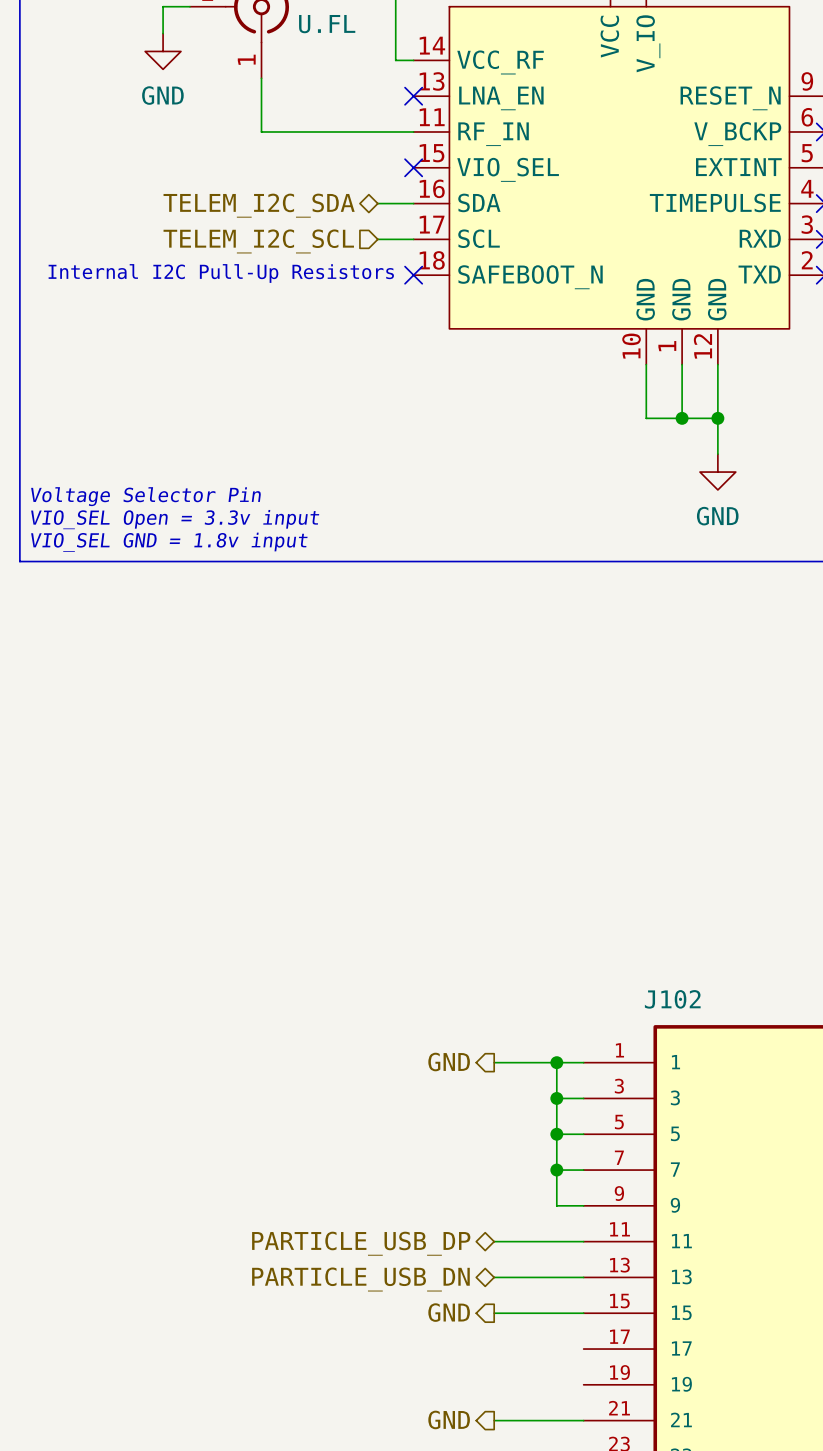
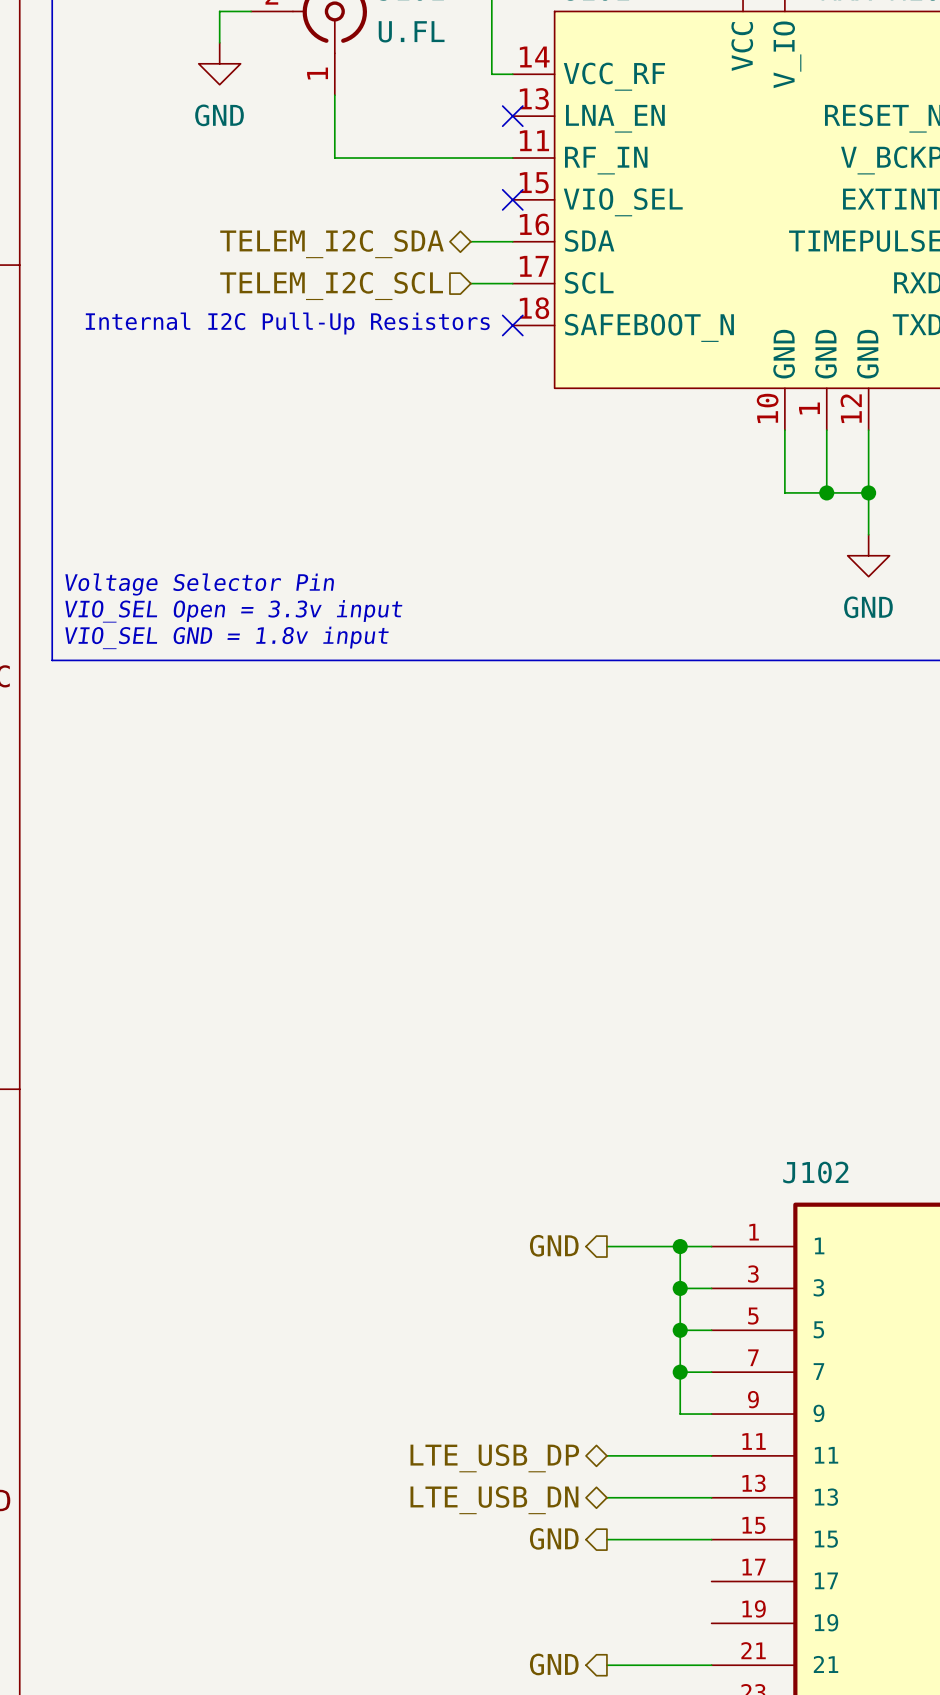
hierarchical label: PARTICLE_USB_DP (361, 1243) -> LTE_USB_DP (494, 1458)
hierarchical label: PARTICLE_USB_DN (360, 1279) -> LTE_USB_DN (494, 1500)

